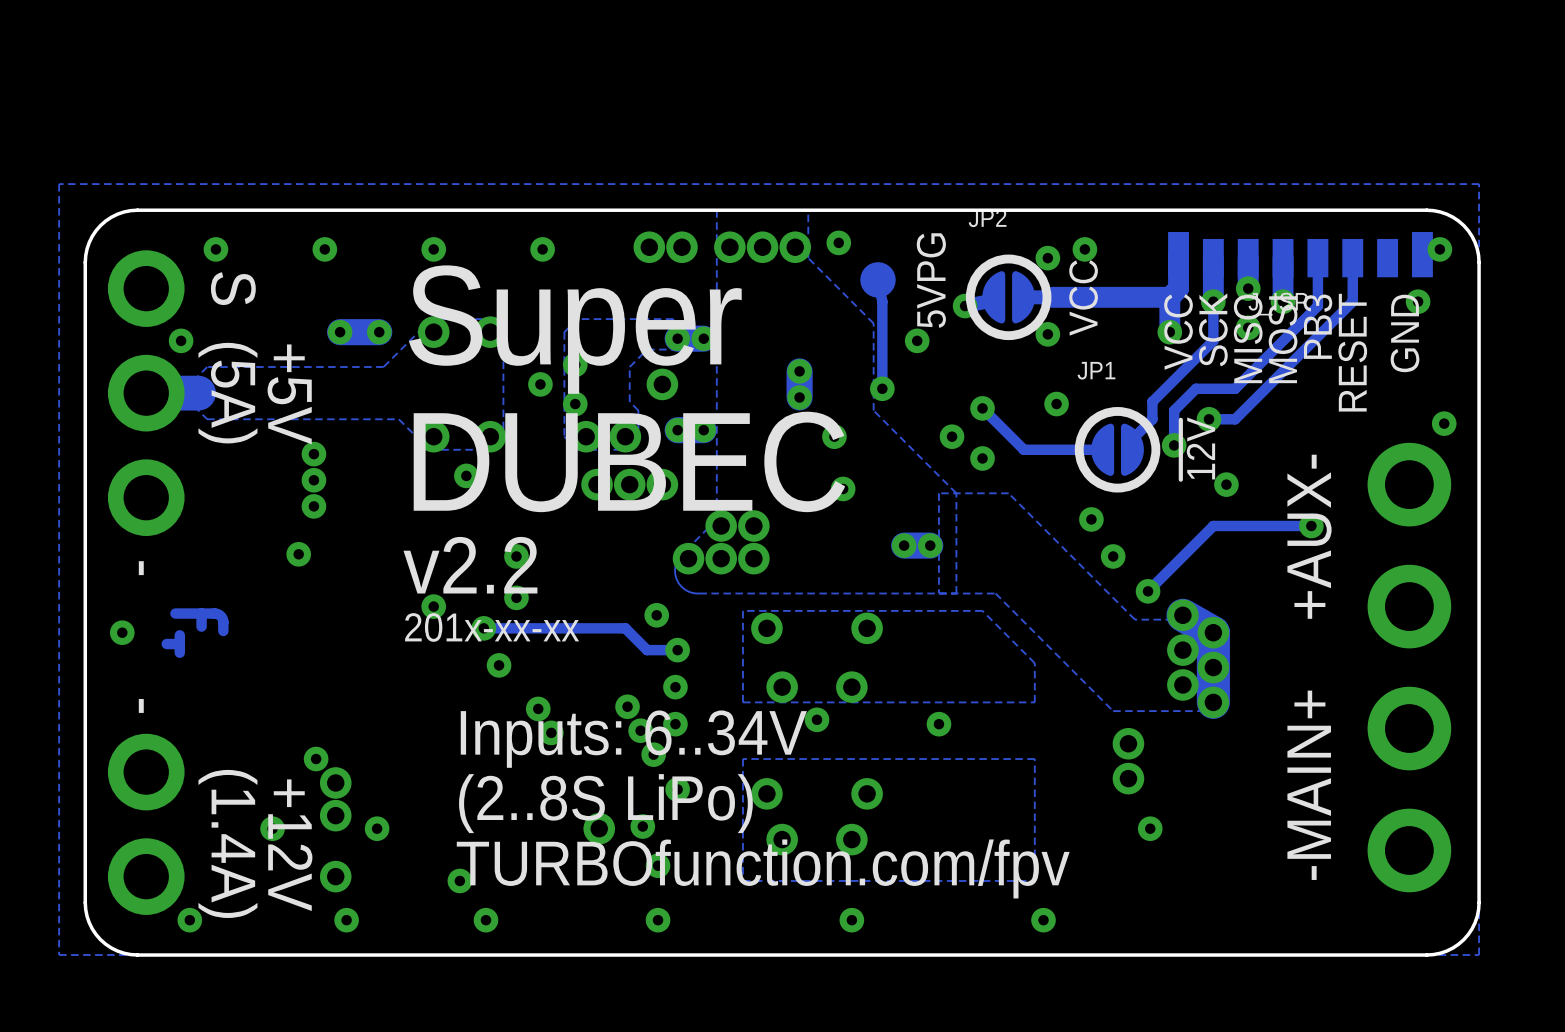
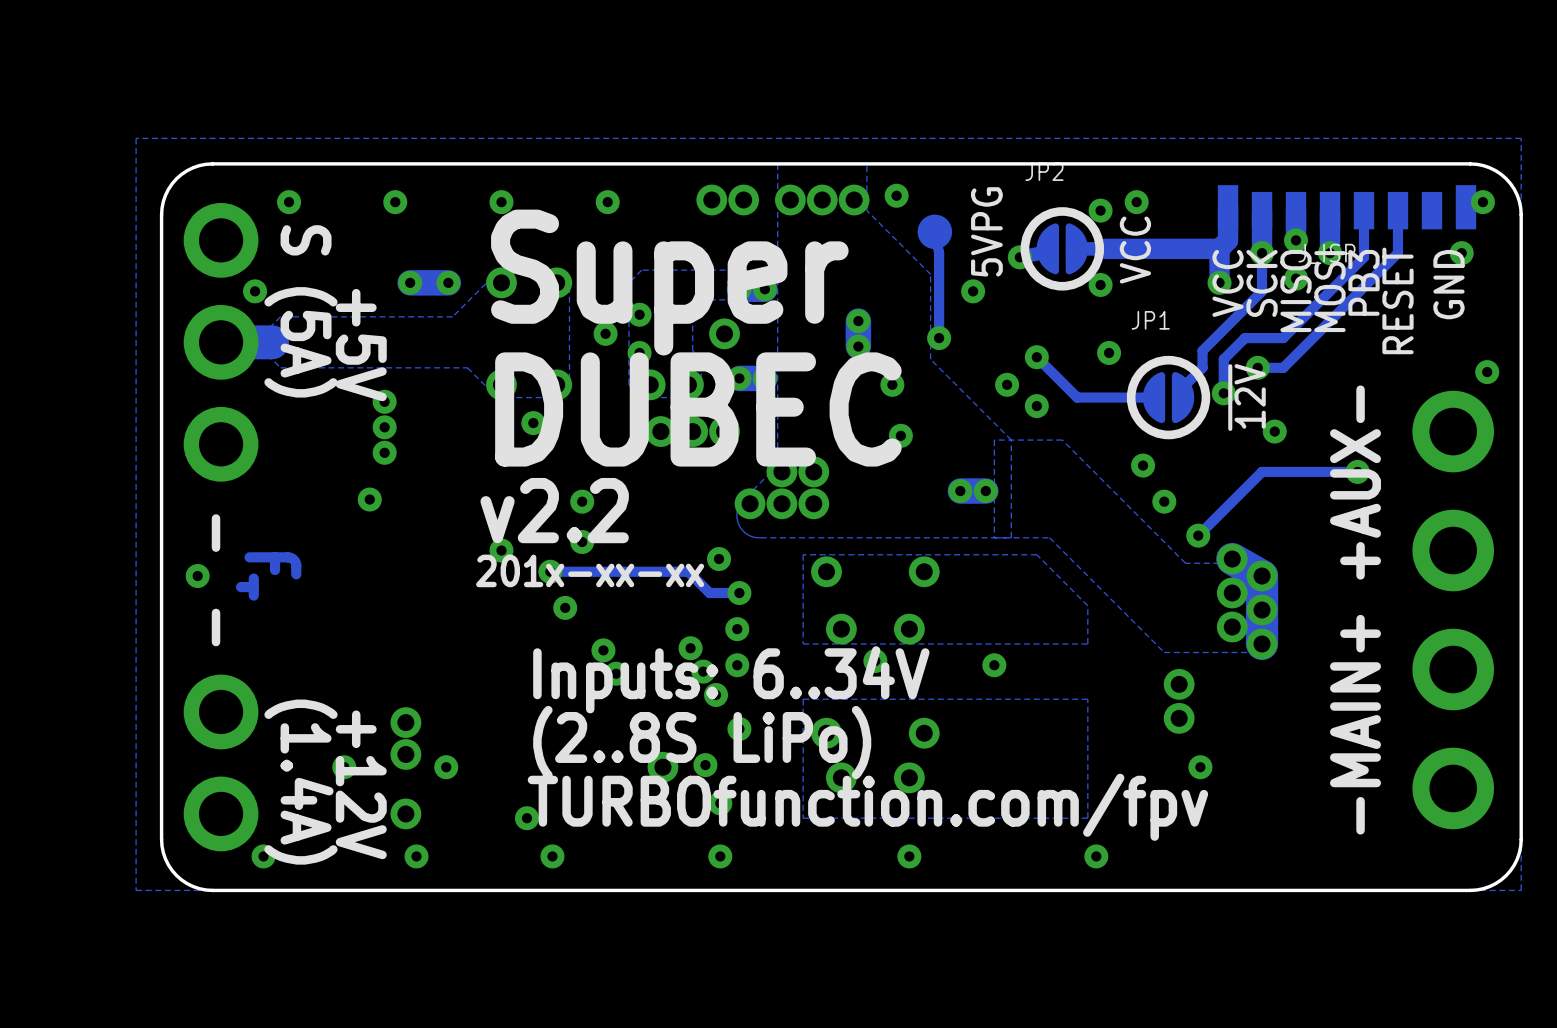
via: (316, 759) -> none

